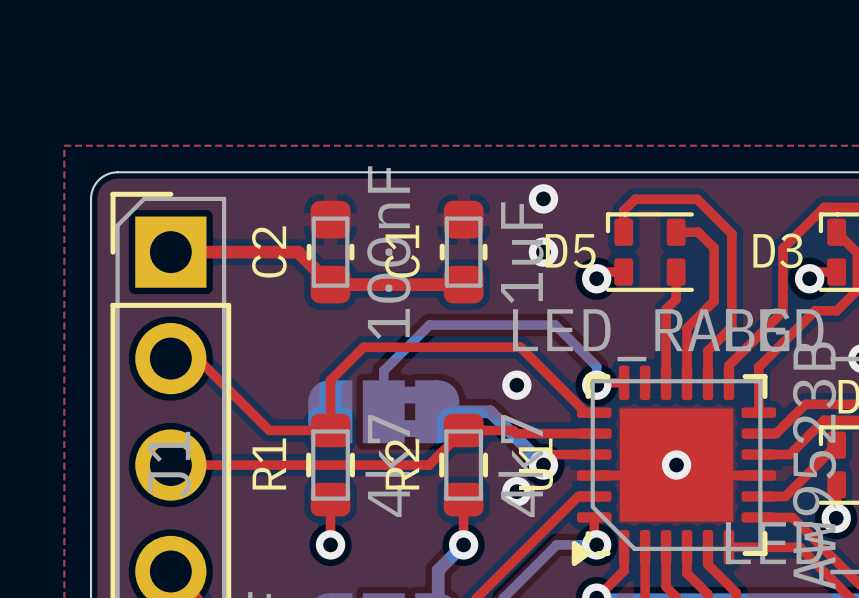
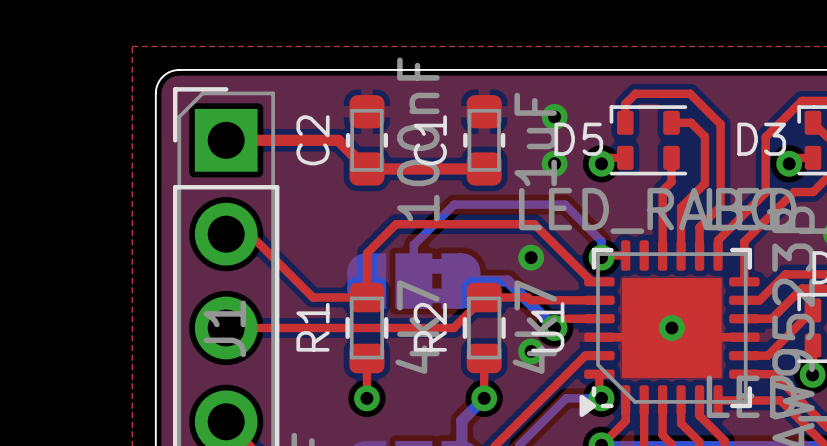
via: (543, 198) -> none
via: none -> (554, 116)
via: (543, 252) -> none
via: none -> (554, 163)

